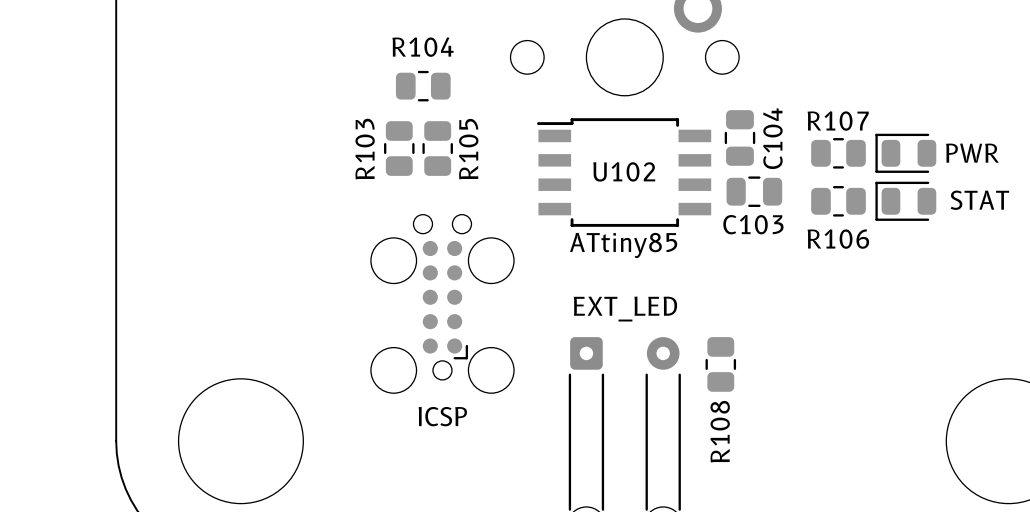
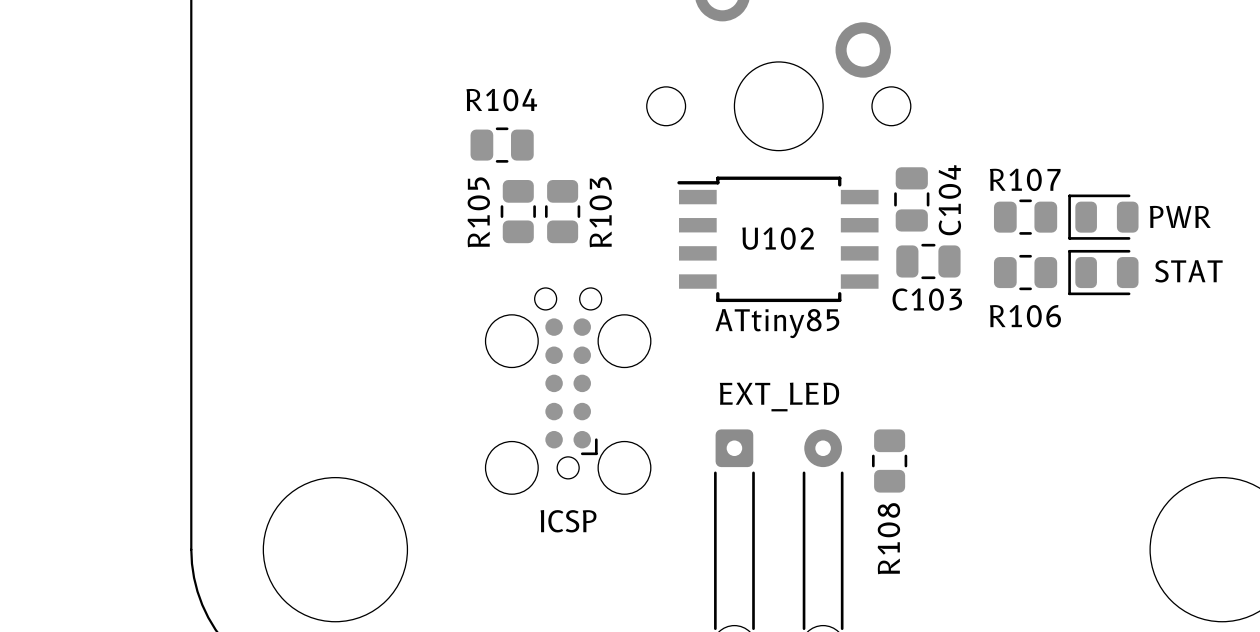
R104 position: (423, 86) -> (502, 145)
R103 name: R103 (365, 149) -> R105 (478, 212)
R105 name: R105 (468, 149) -> R103 (600, 212)

